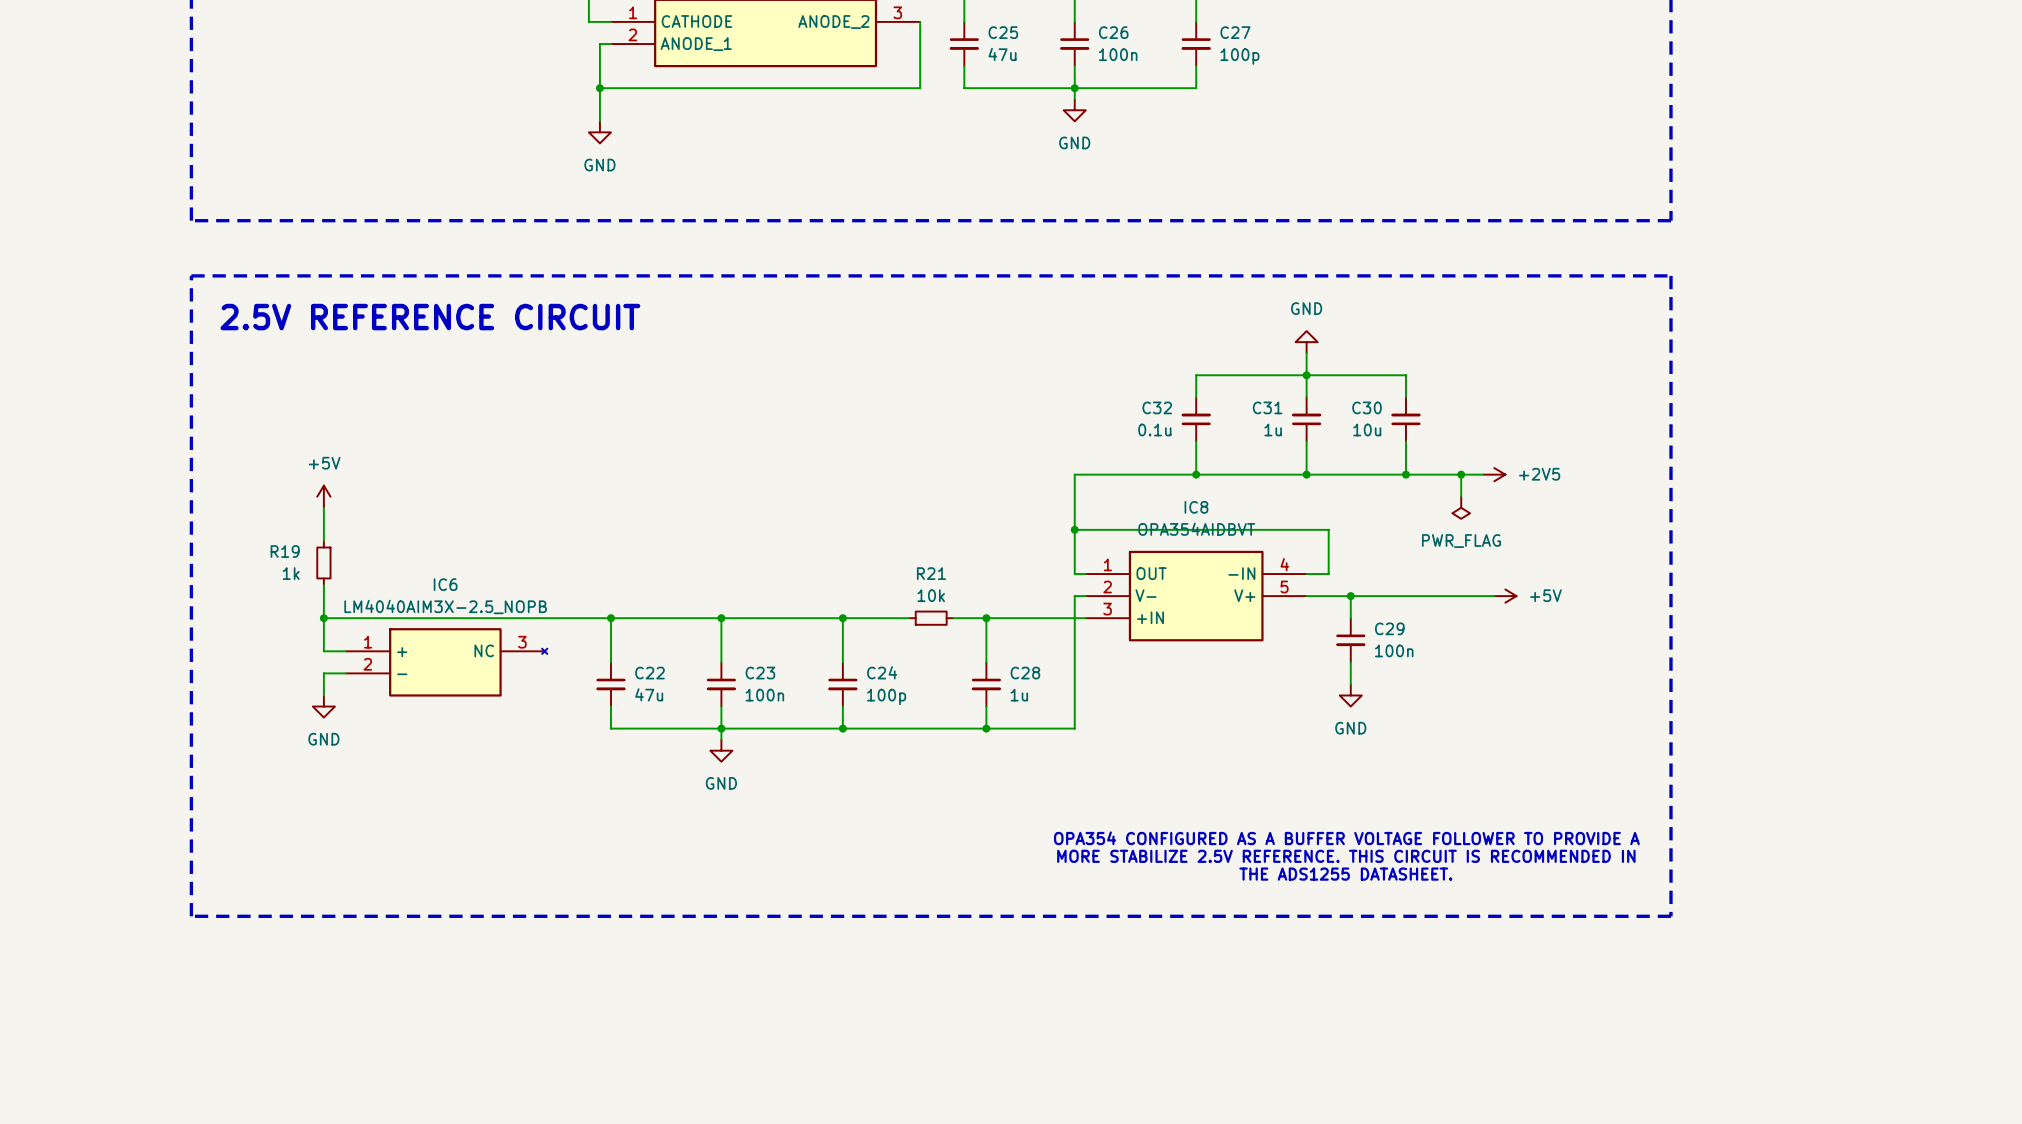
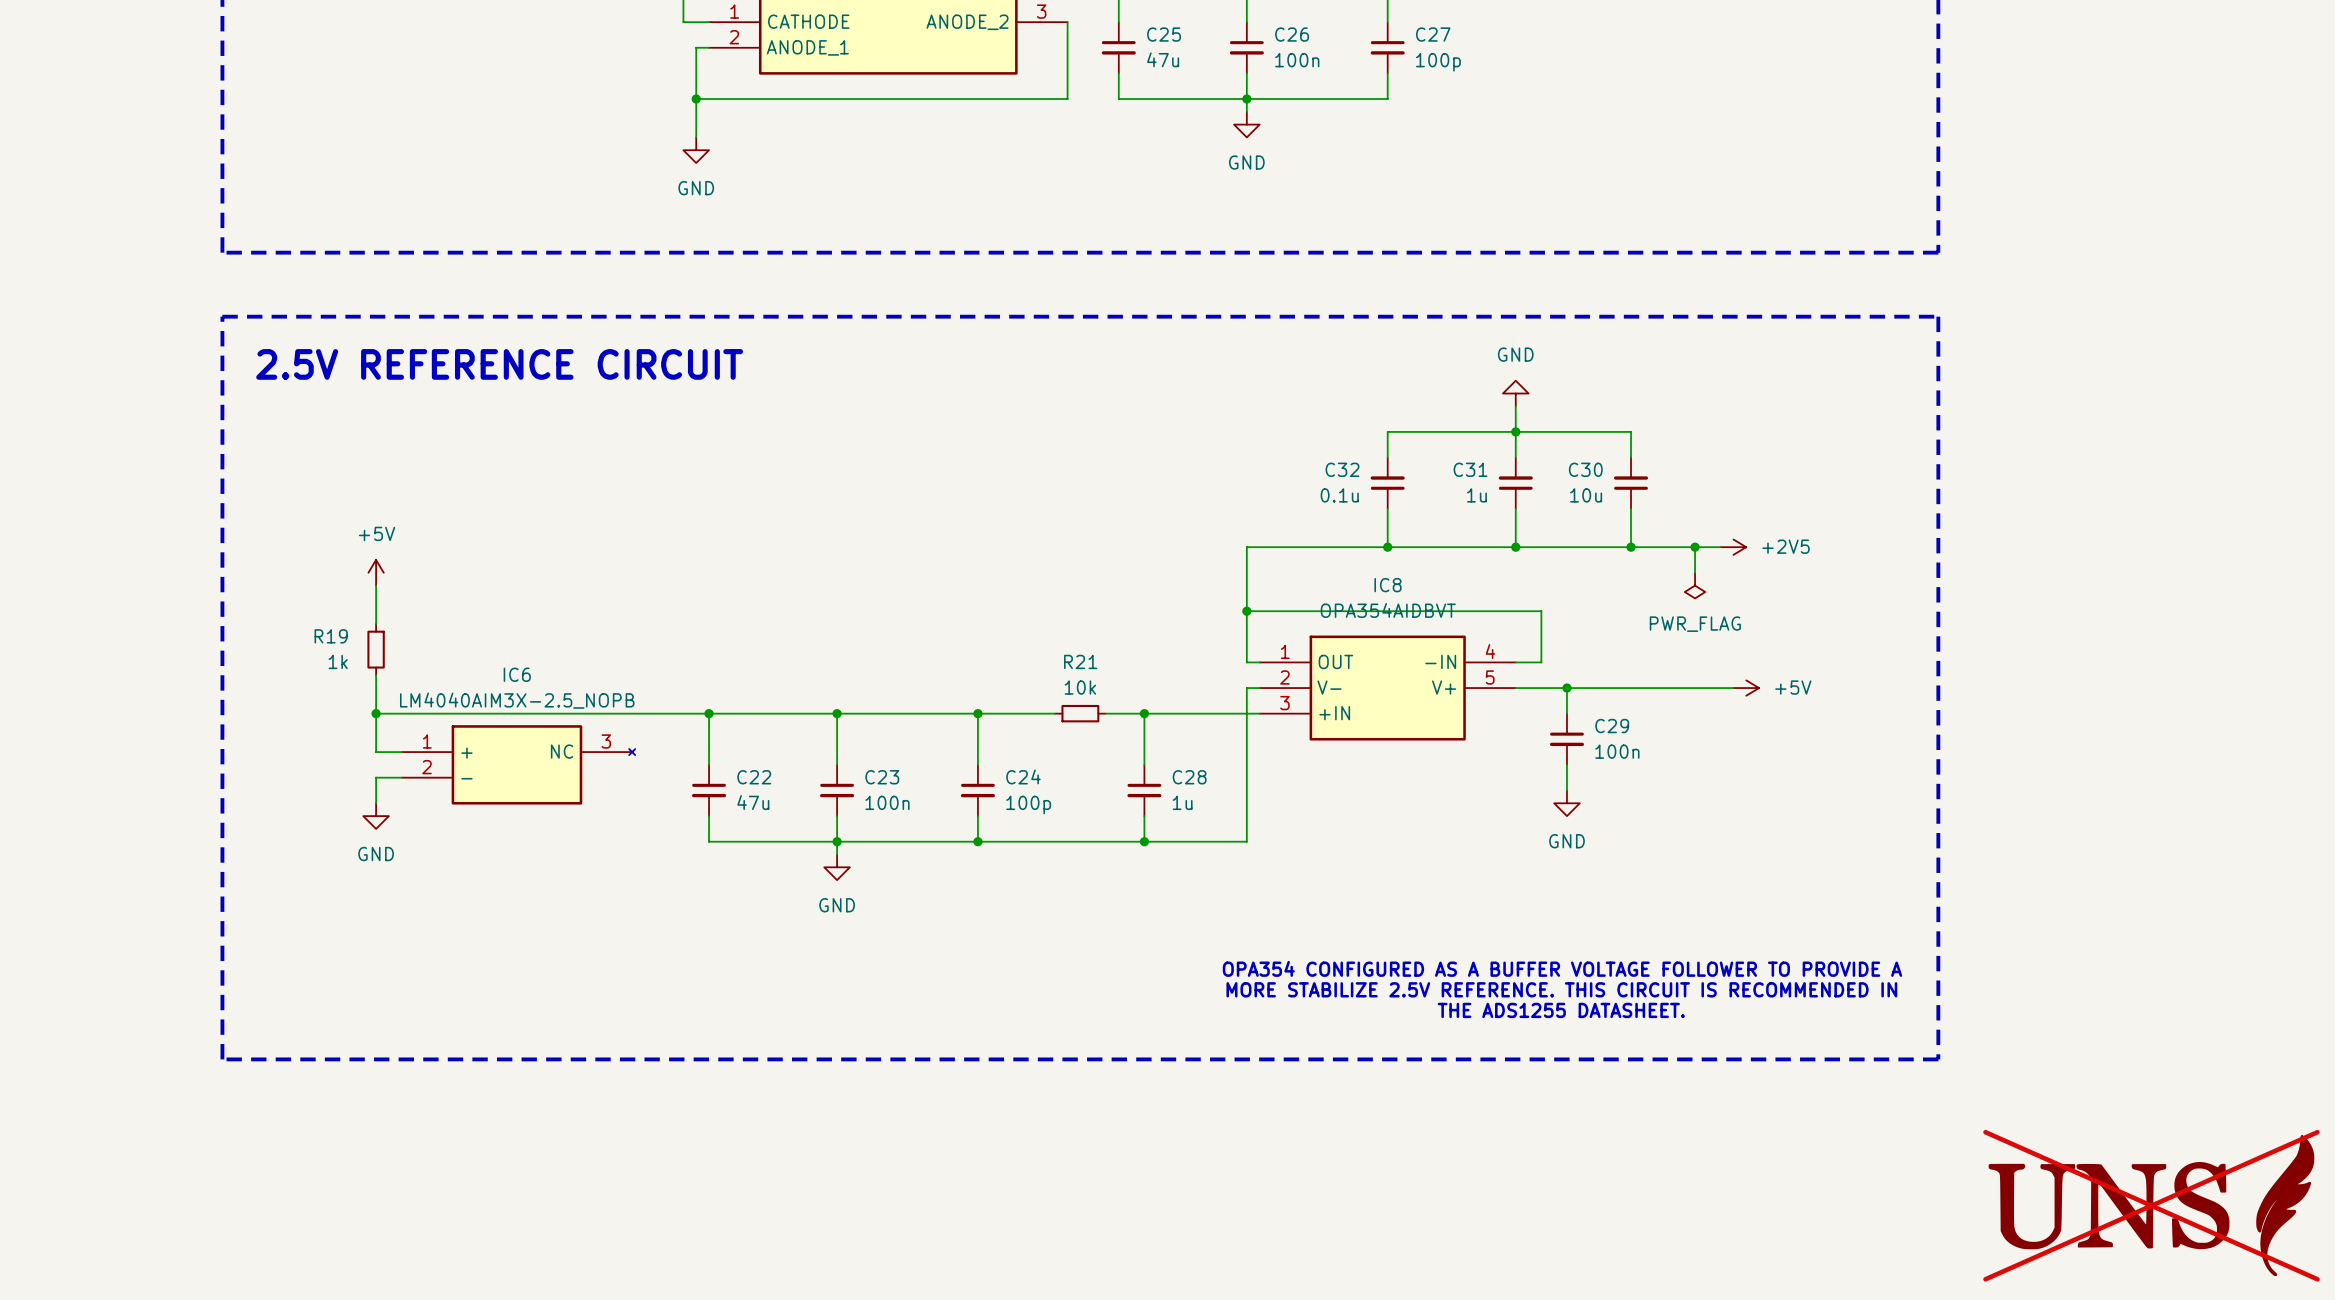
part: none -> (2151, 1205)

